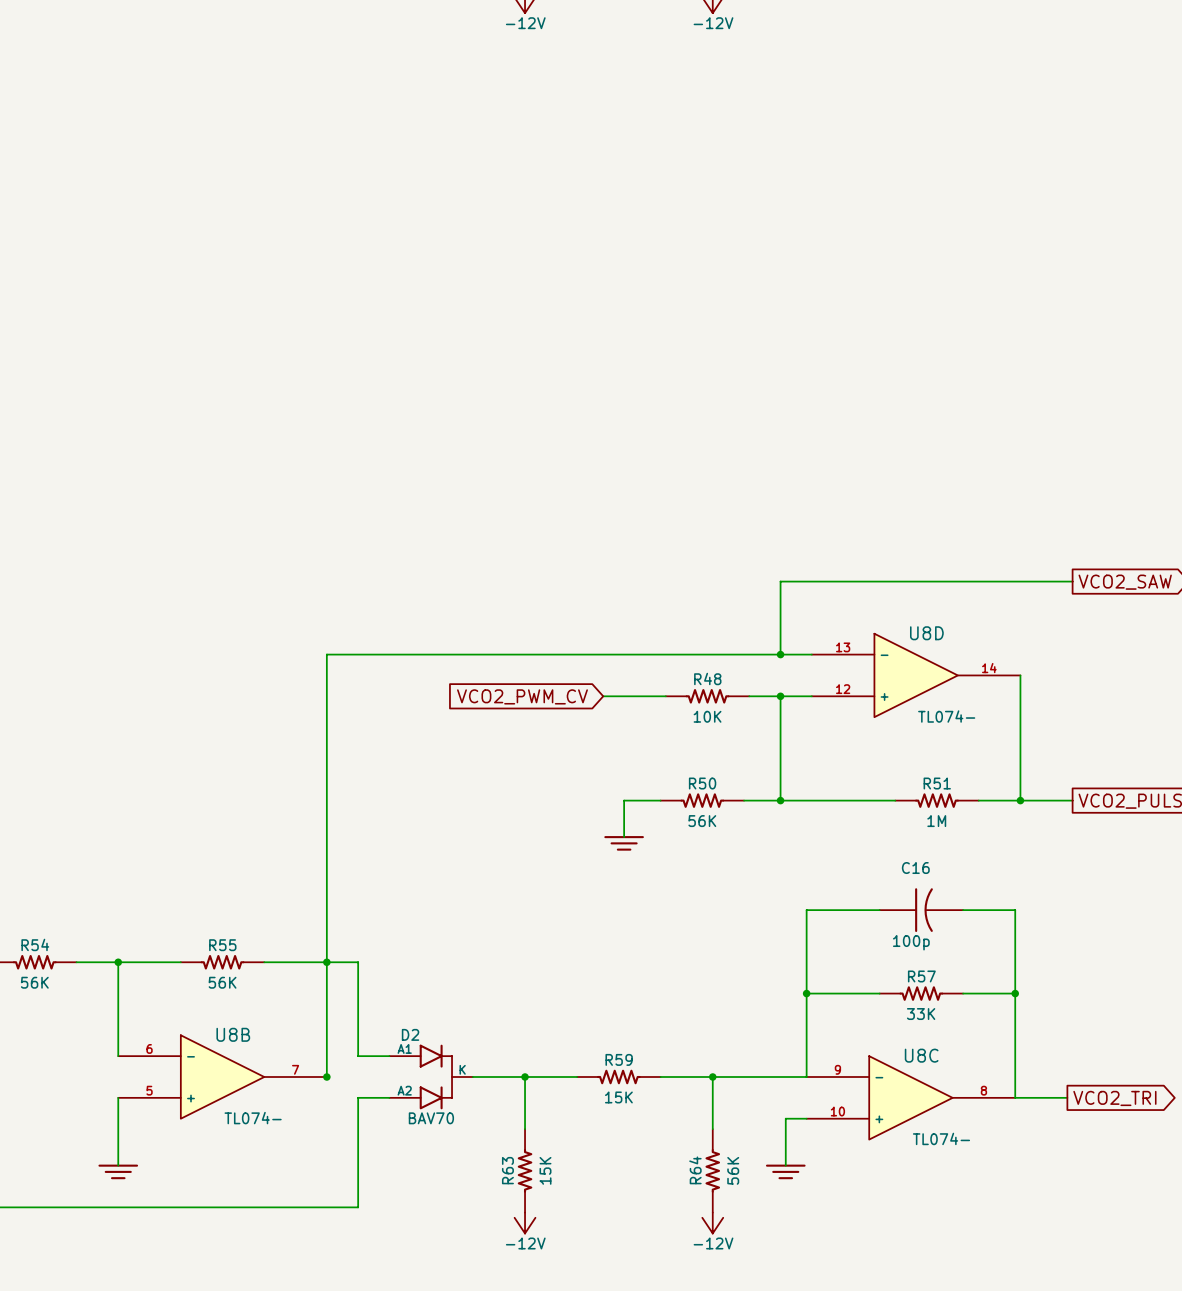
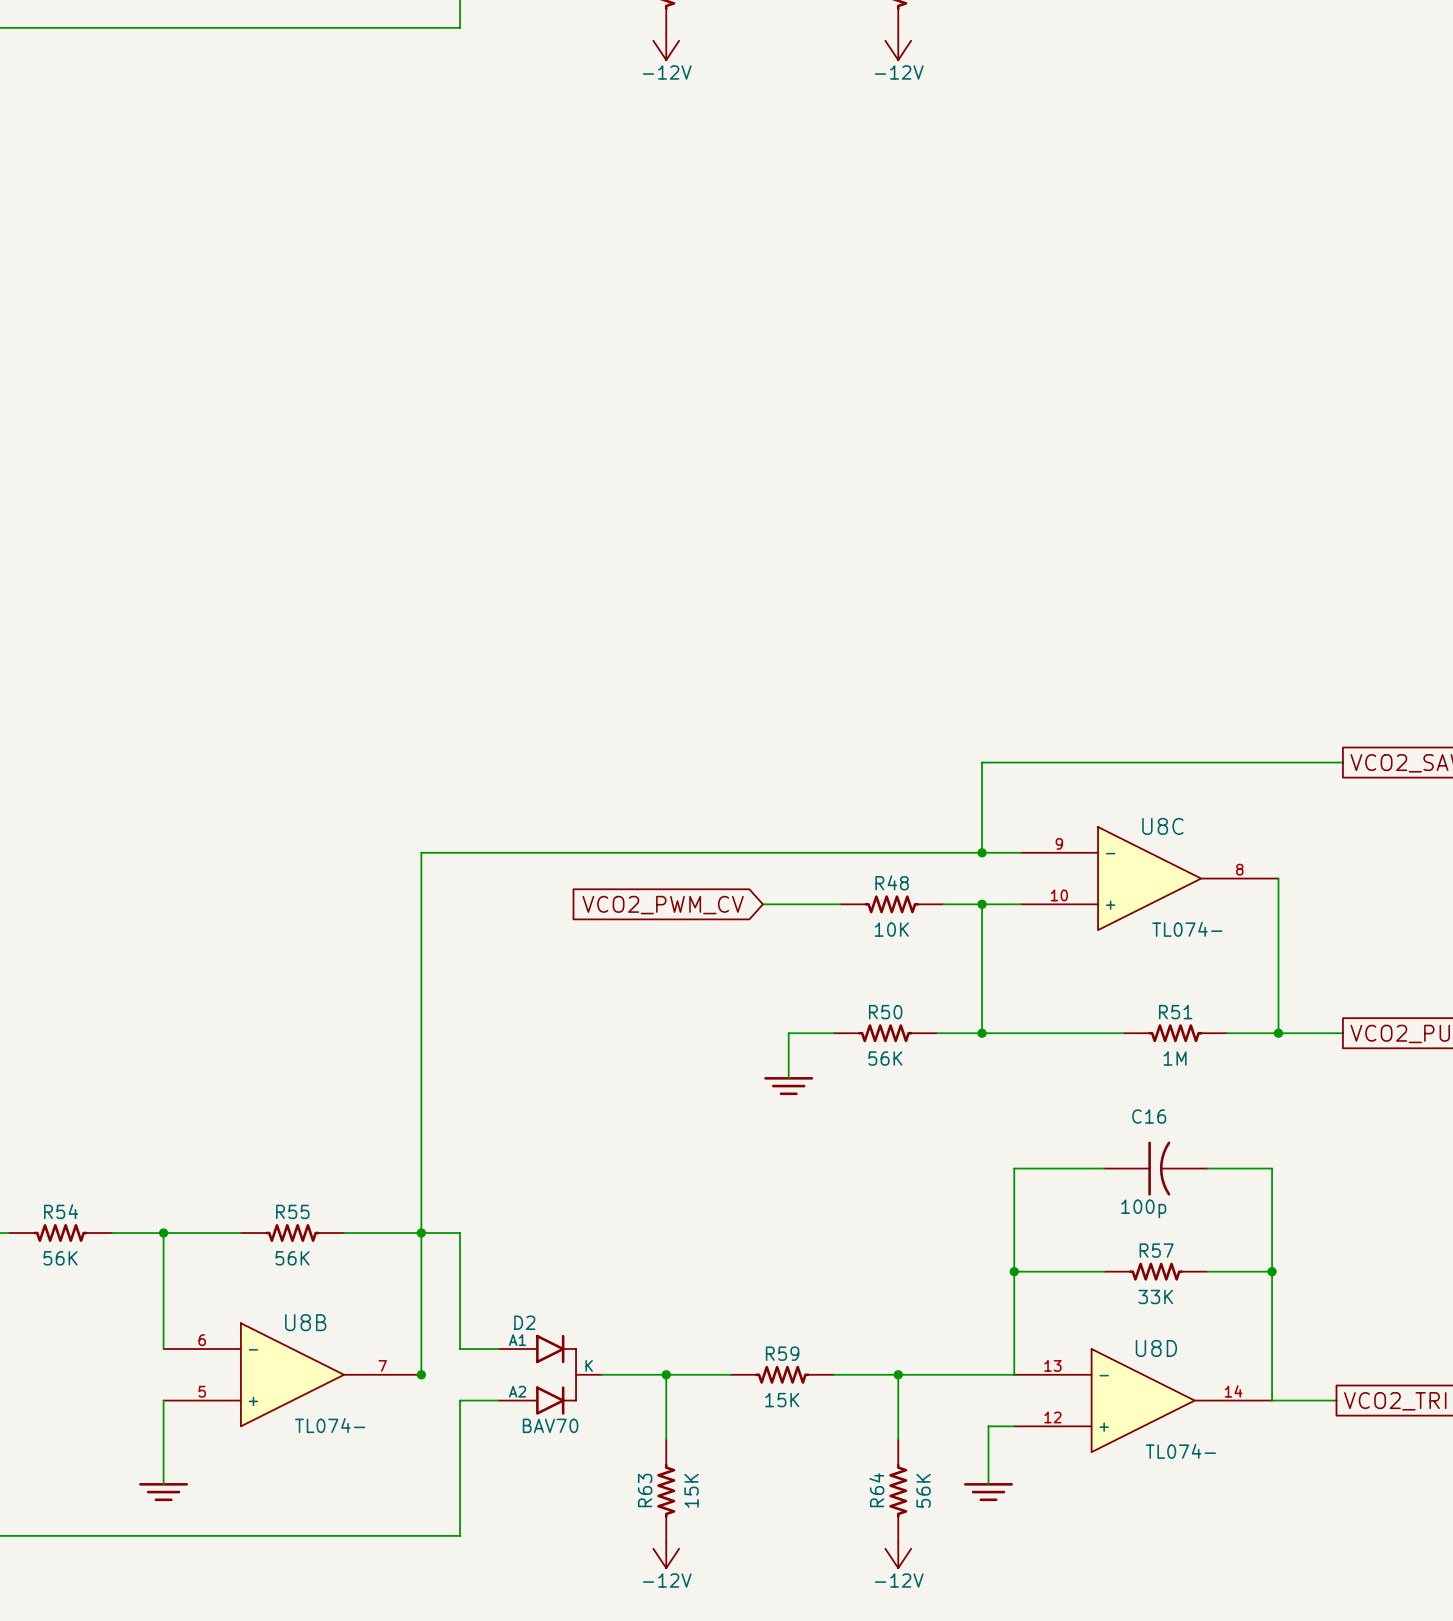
U8D position: (916, 675) -> (1143, 1400)
U8C position: (910, 1097) -> (1149, 878)

